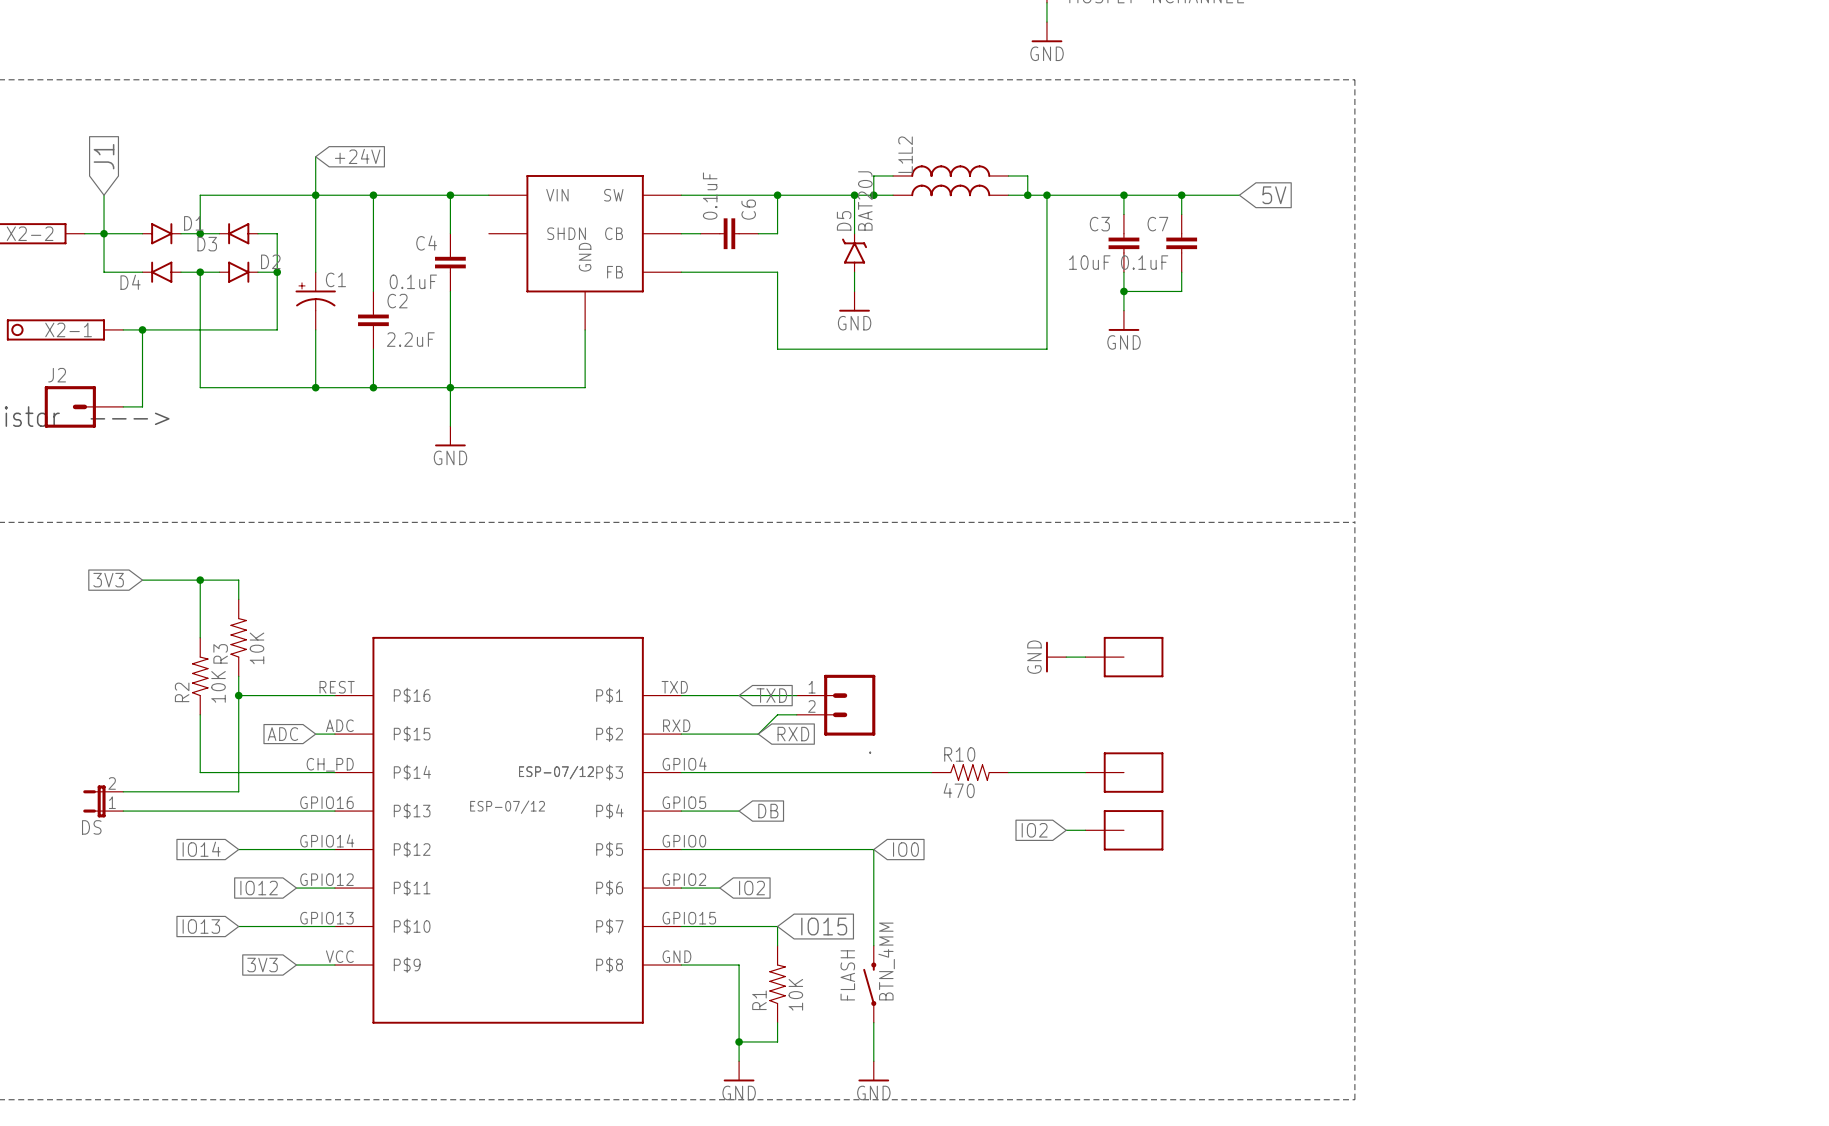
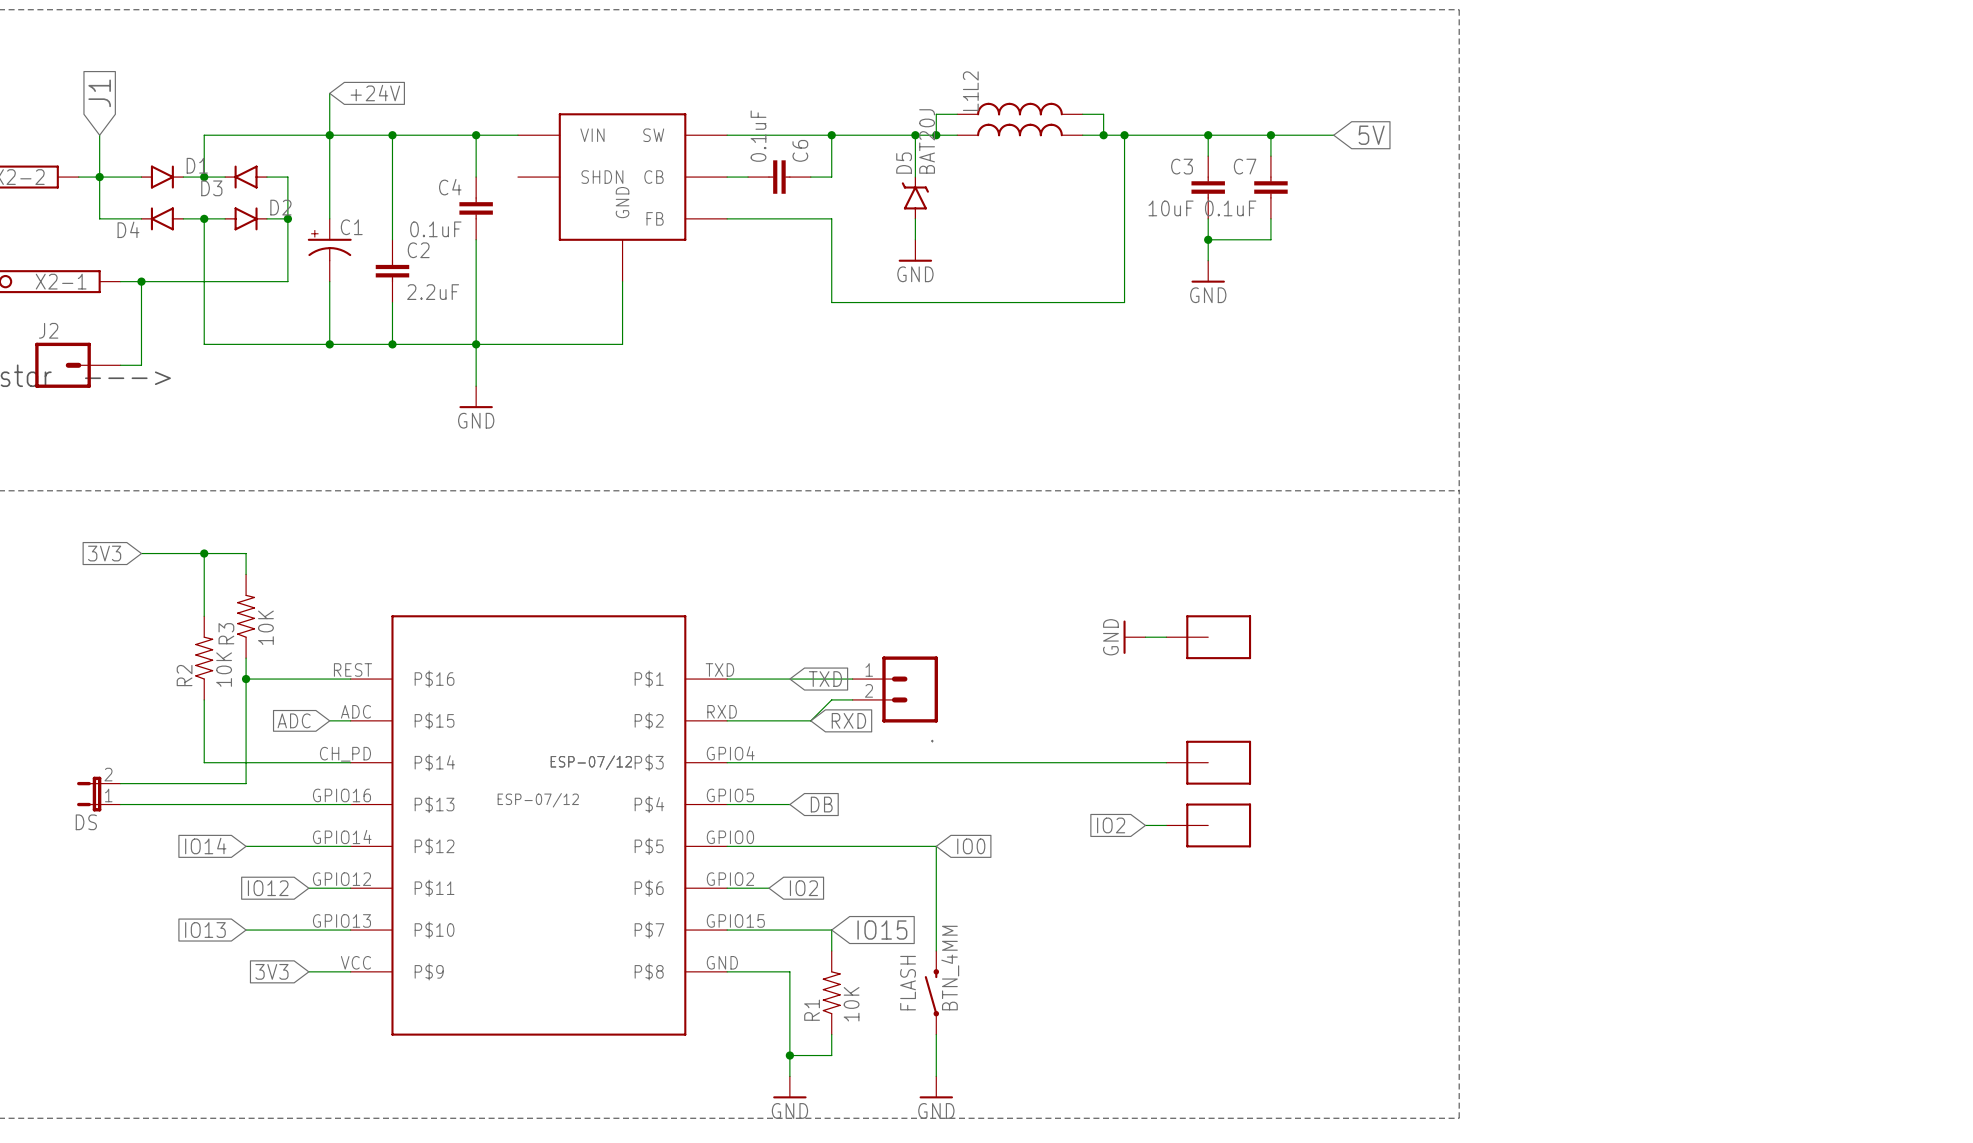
R10: 470 (970, 772) -> none

